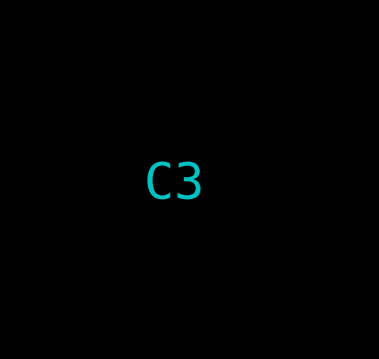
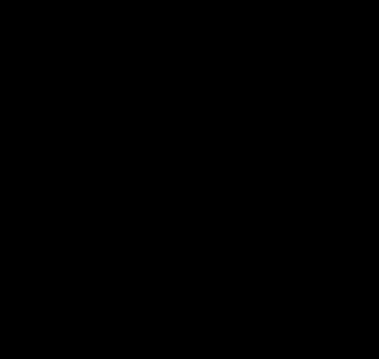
text: C3 (173, 180) -> none

